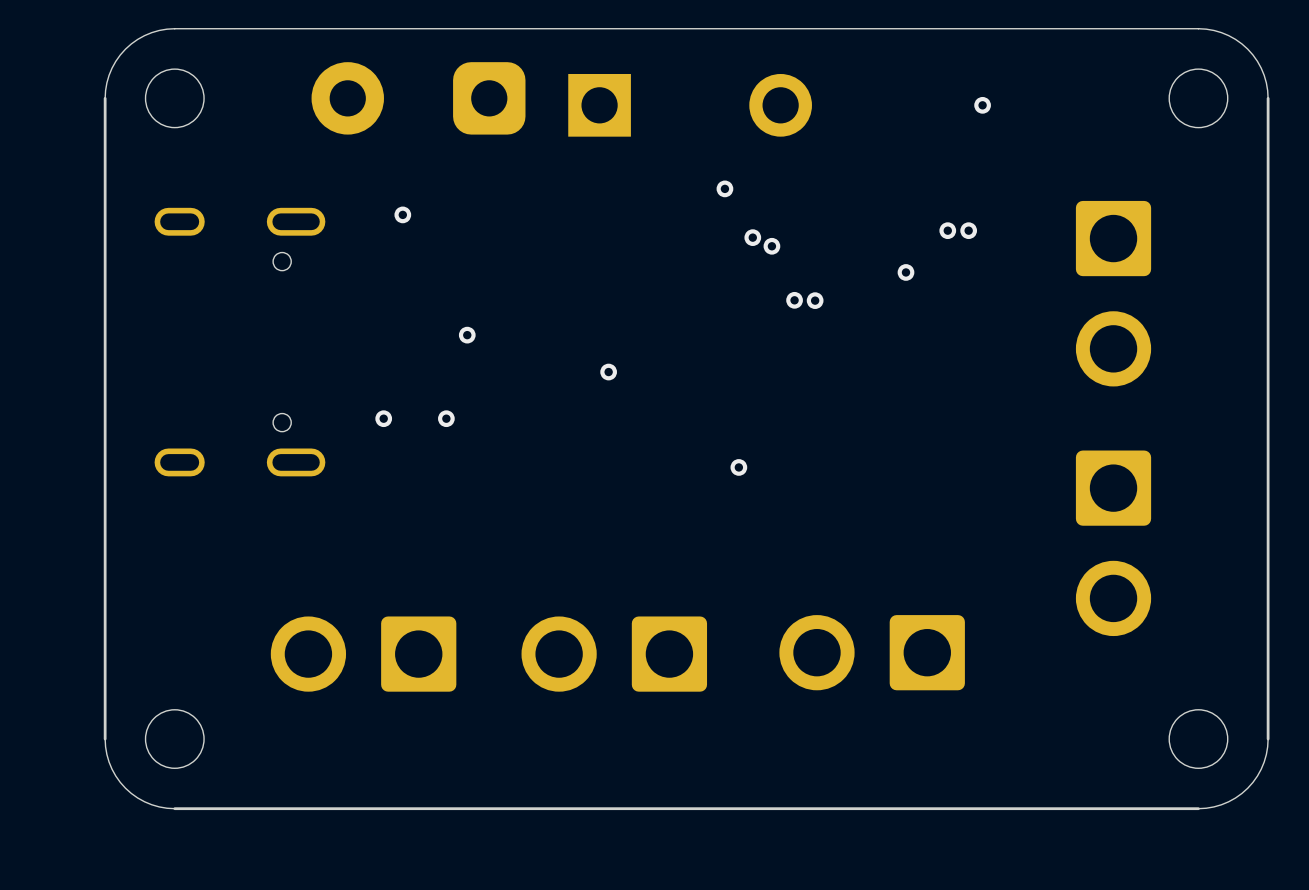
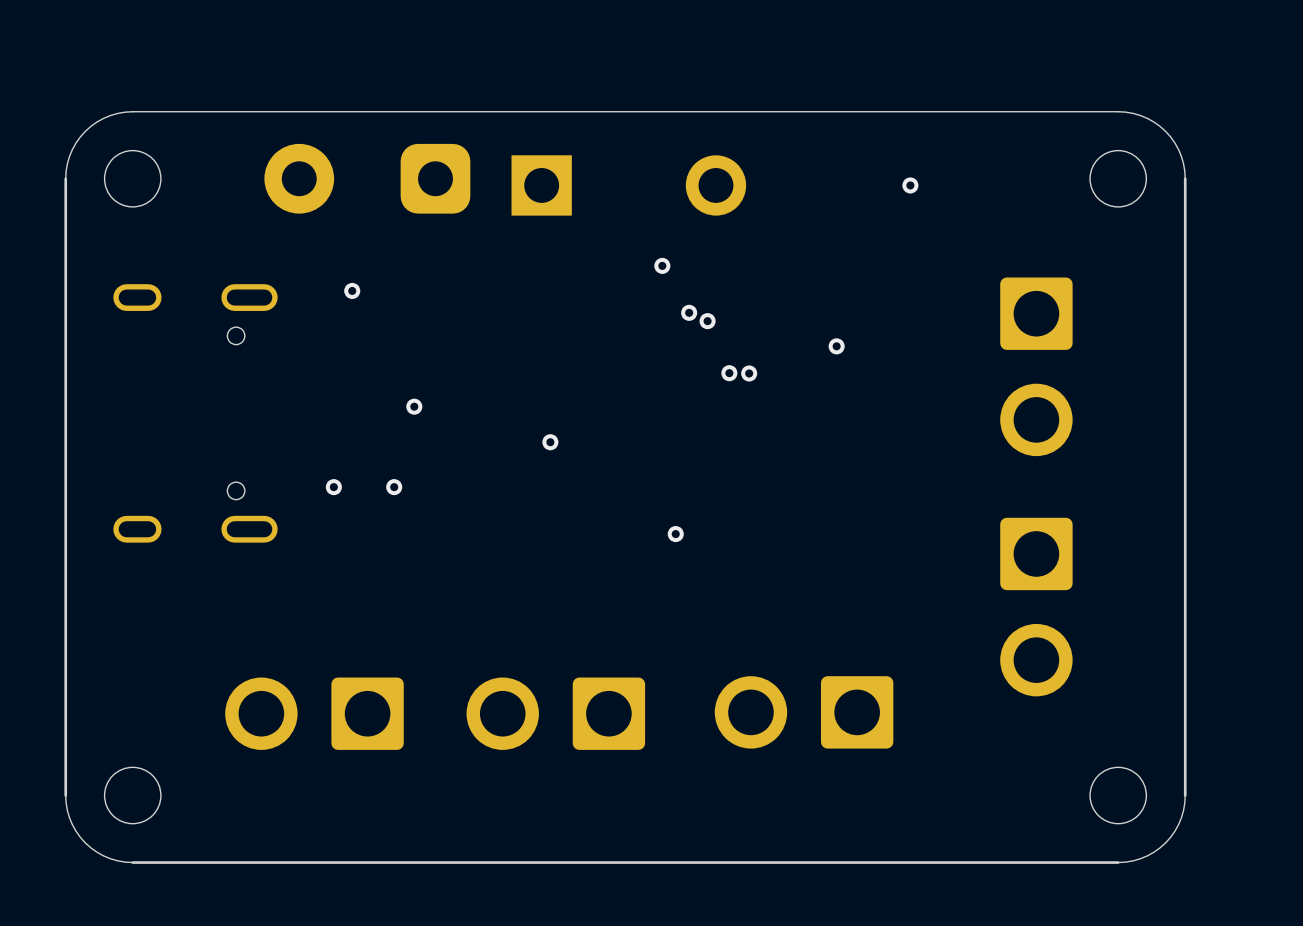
via: (947, 230) -> none
via: (968, 230) -> none

